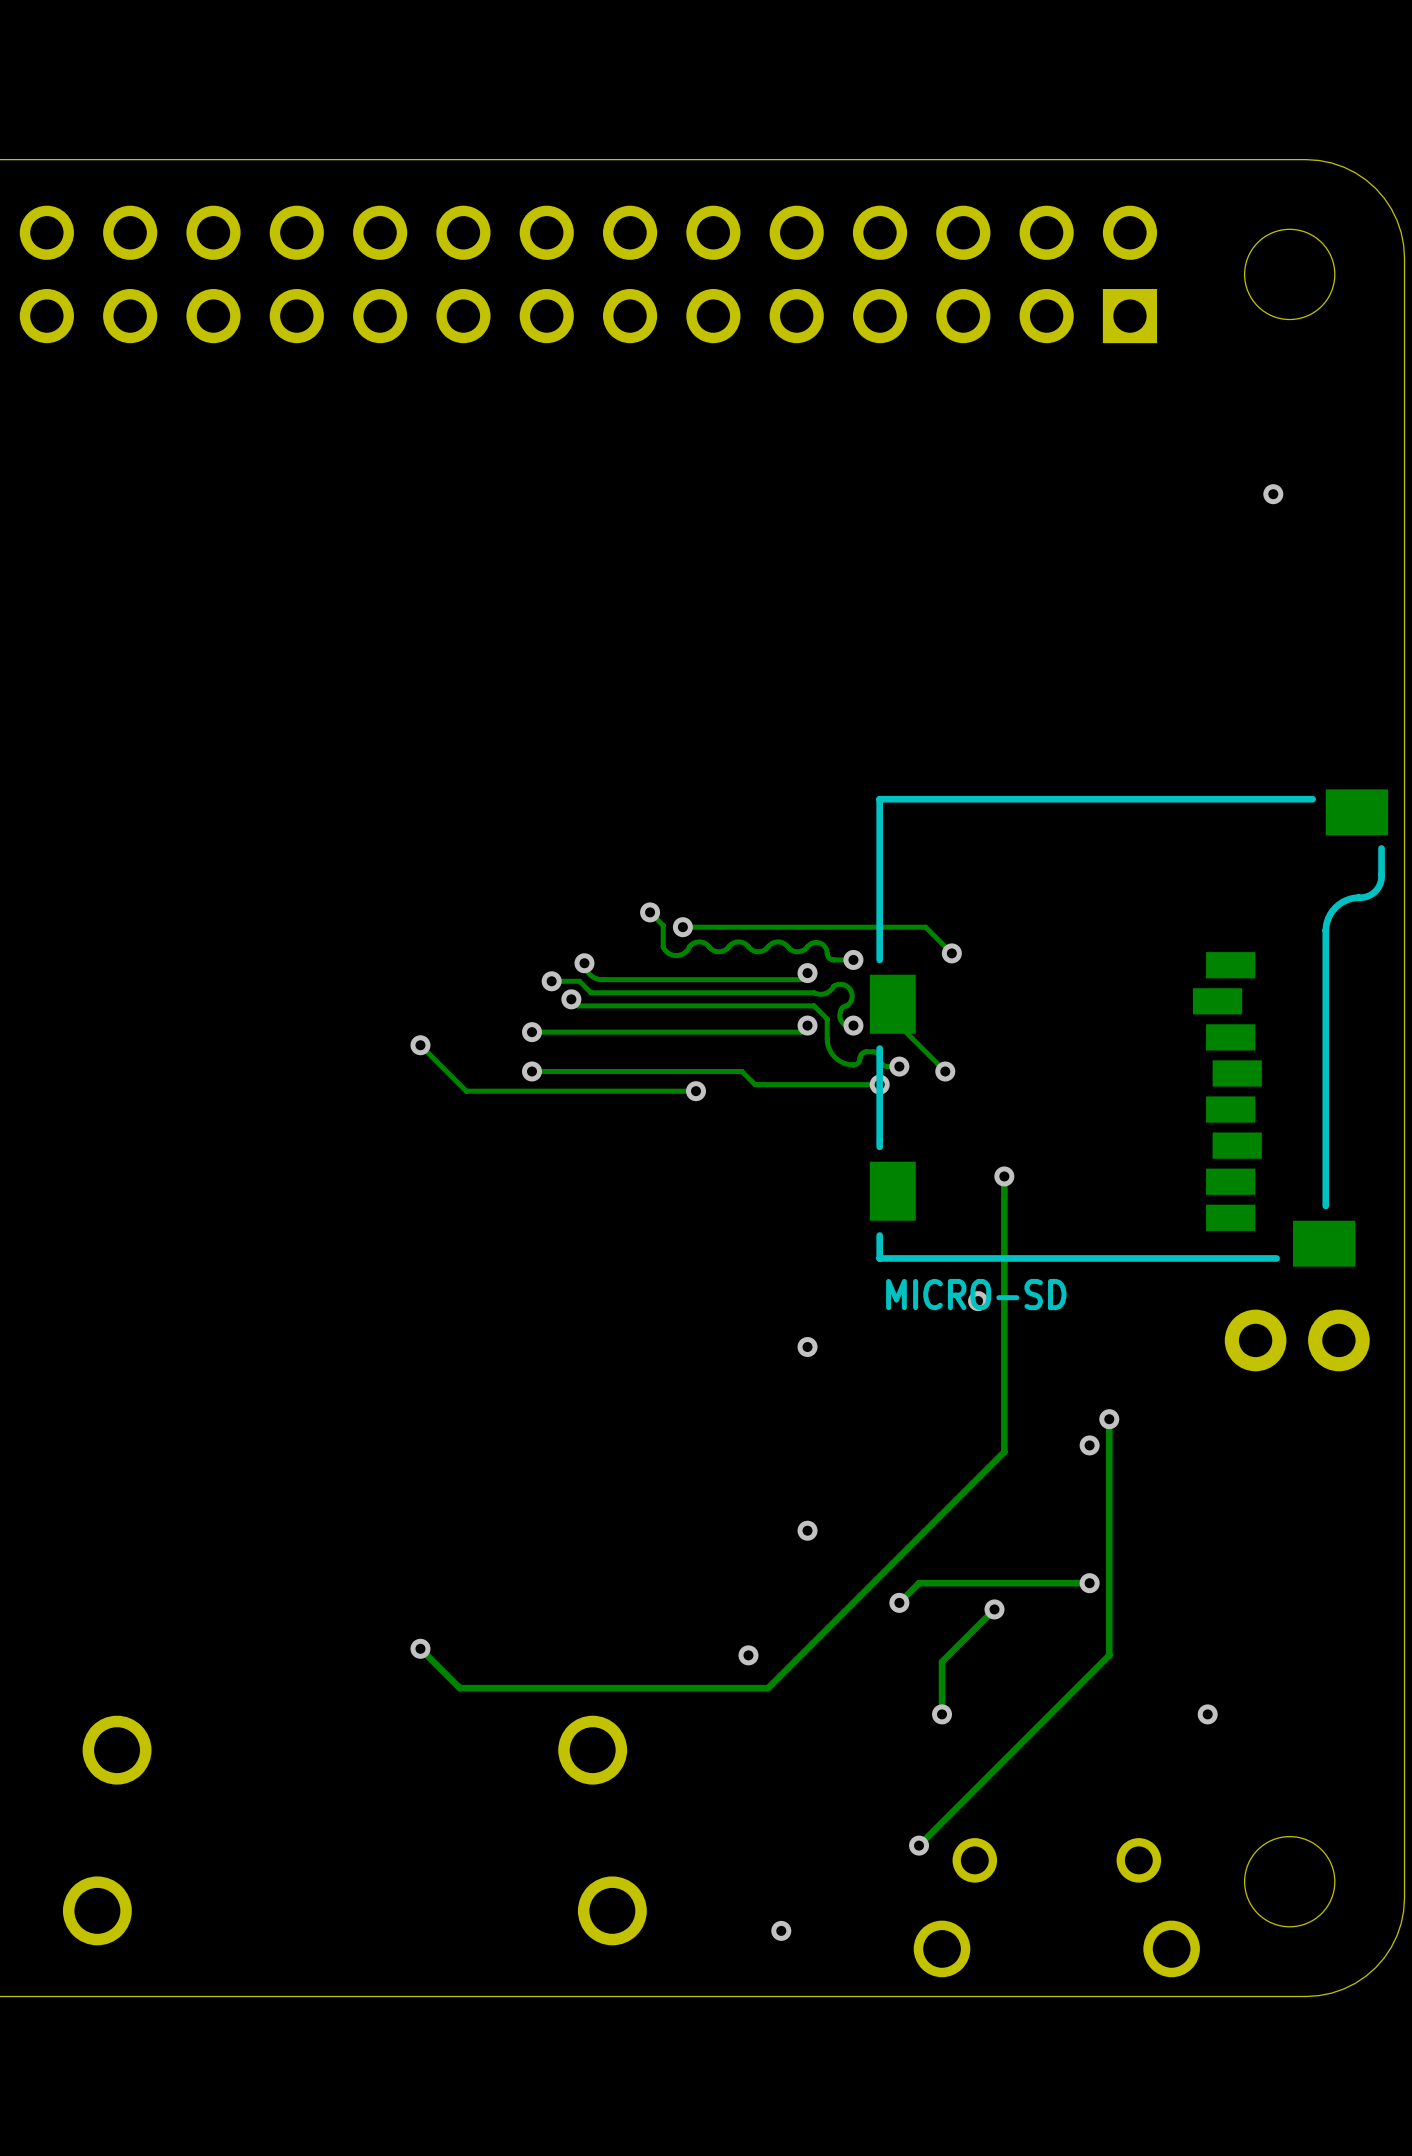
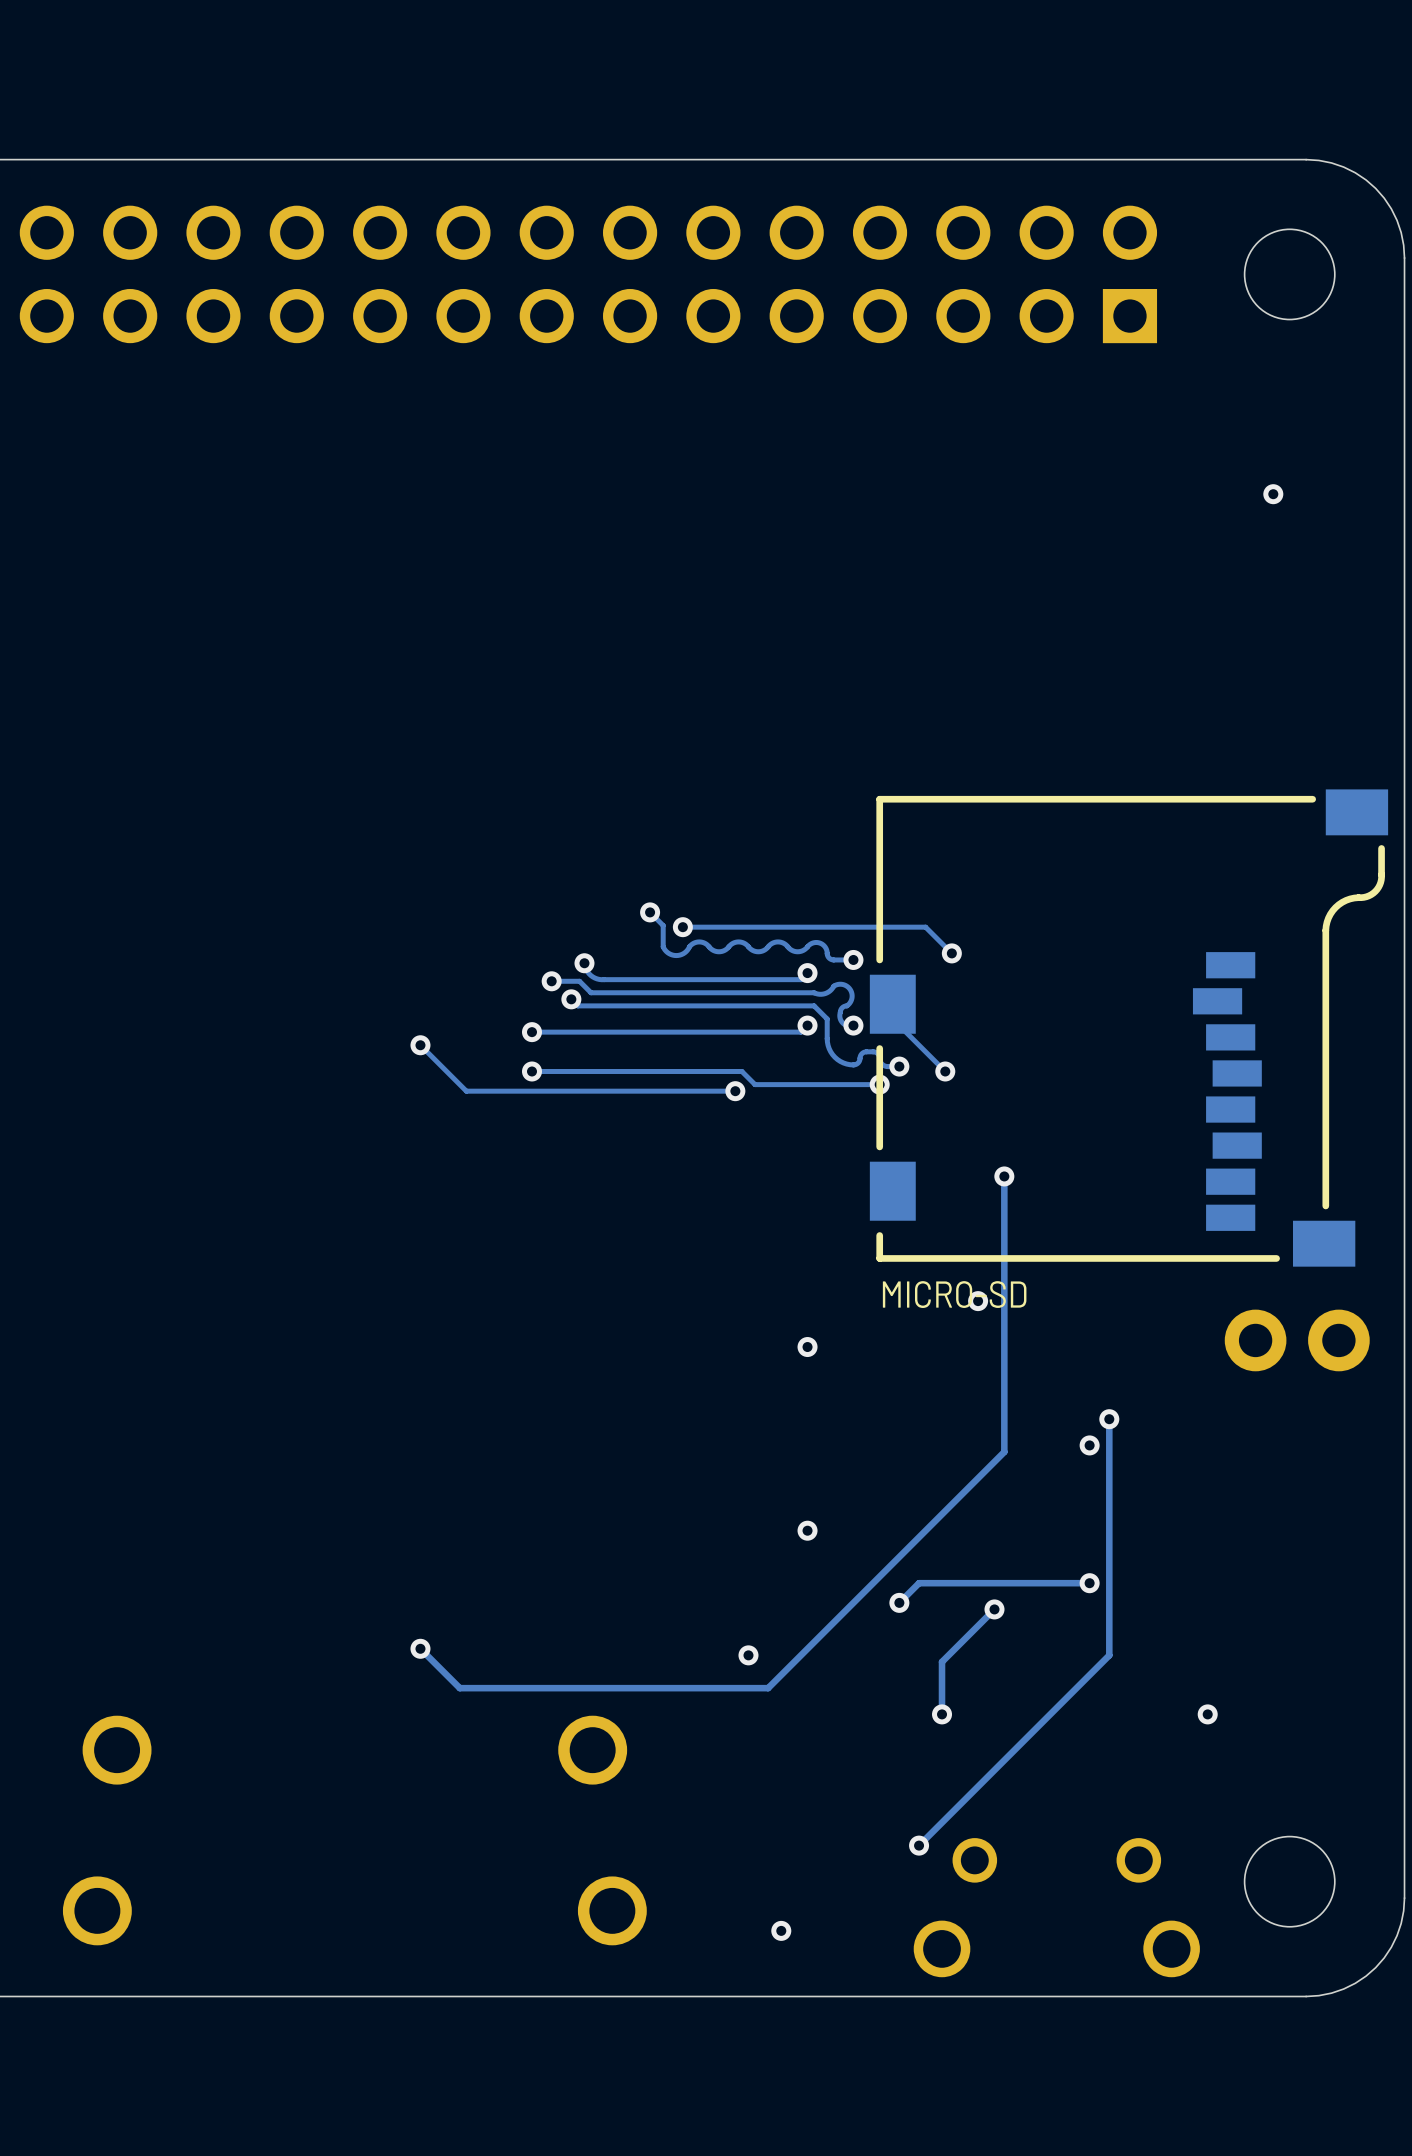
via position: (696, 1091) -> (735, 1091)
track: none -> (735, 1091) (696, 1091)

